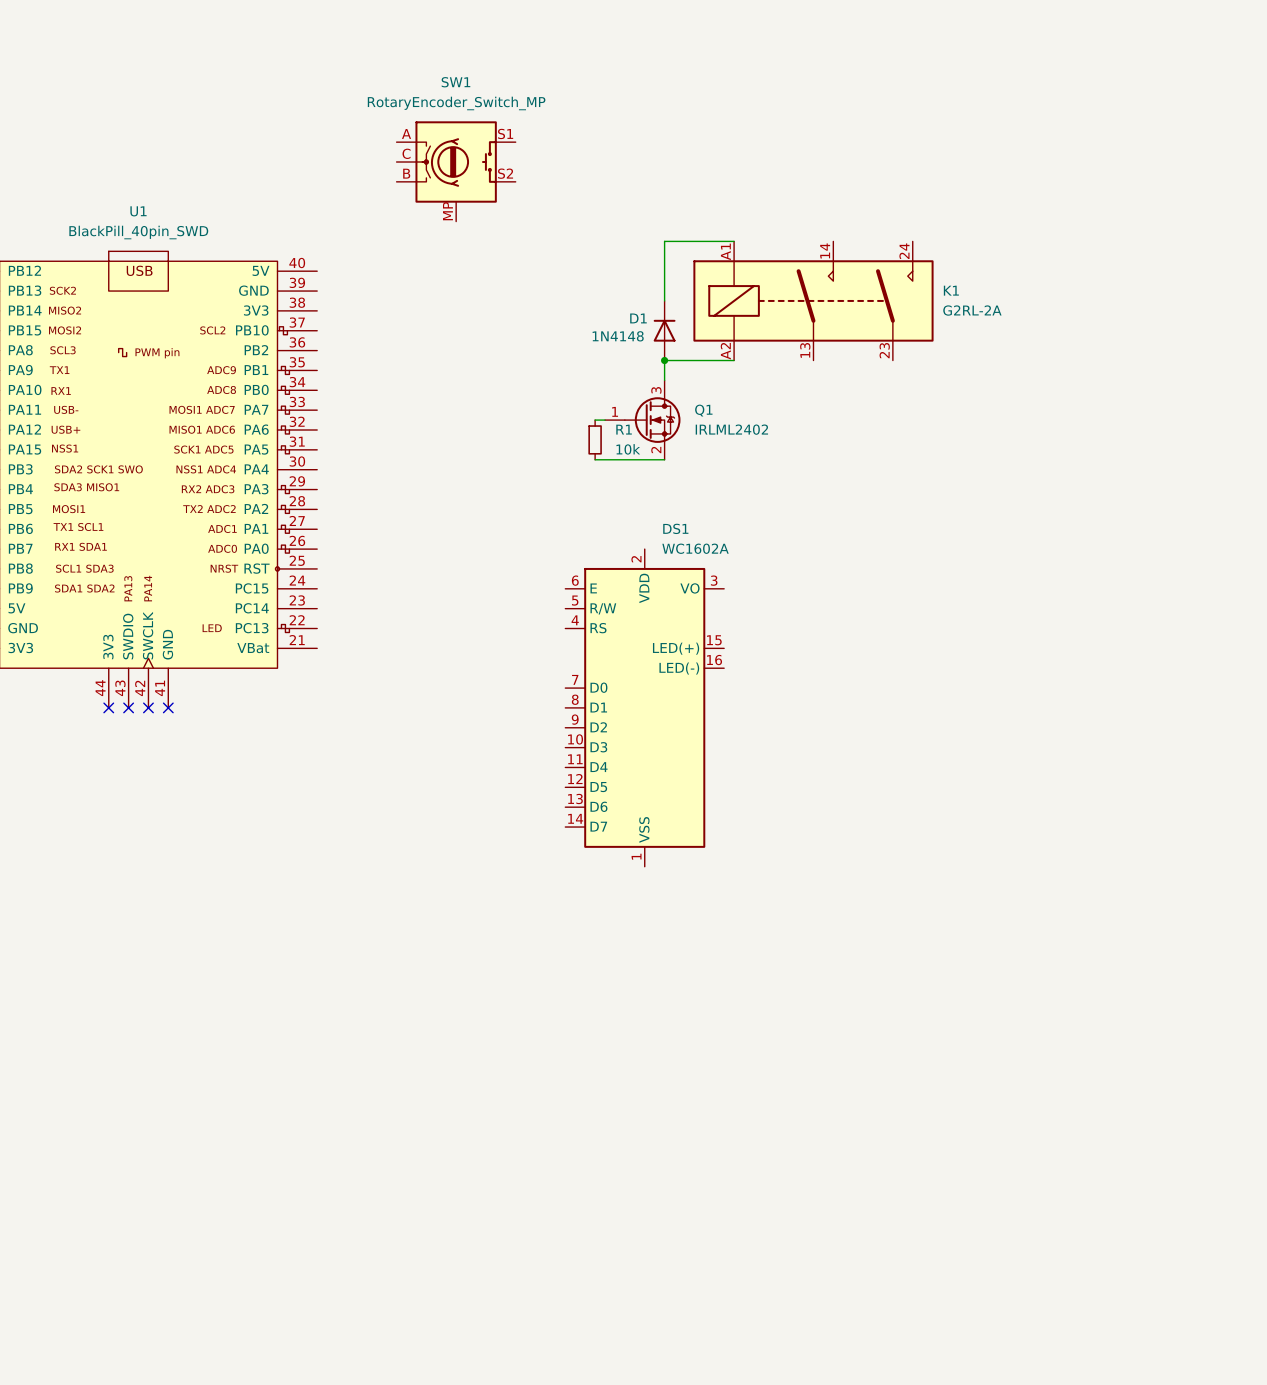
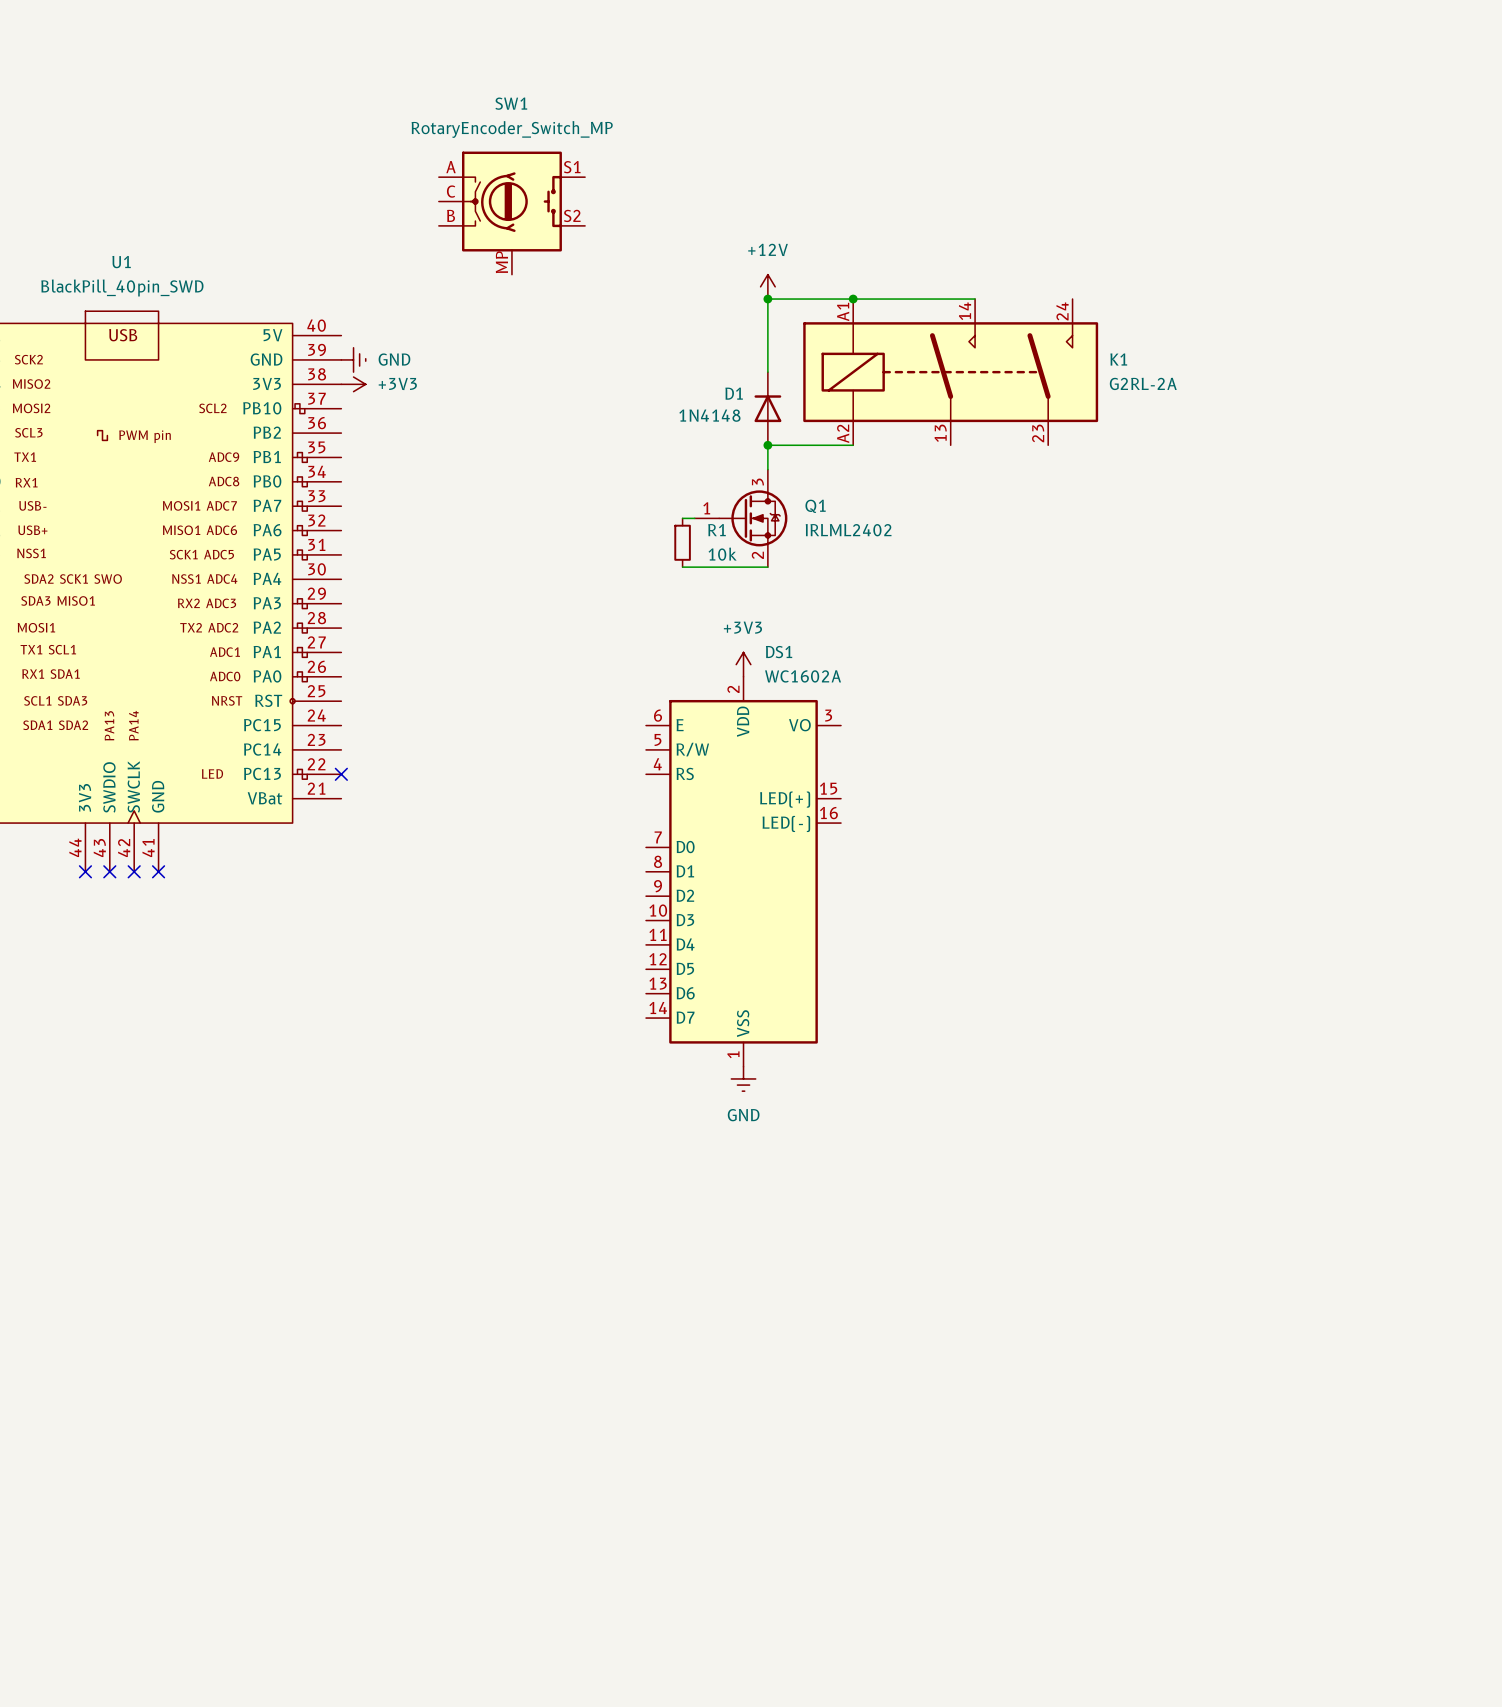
power symbol: none -> +12V (767, 286)
junction: none -> (767, 299)
wire: none -> (853, 299) (975, 299)
junction: none -> (853, 299)
power symbol: none -> GND (353, 359)
power symbol: none -> +3V3 (353, 384)
power symbol: none -> +3V3 (743, 664)
no-connect mark: none -> (341, 774)
power symbol: none -> GND (743, 1078)

